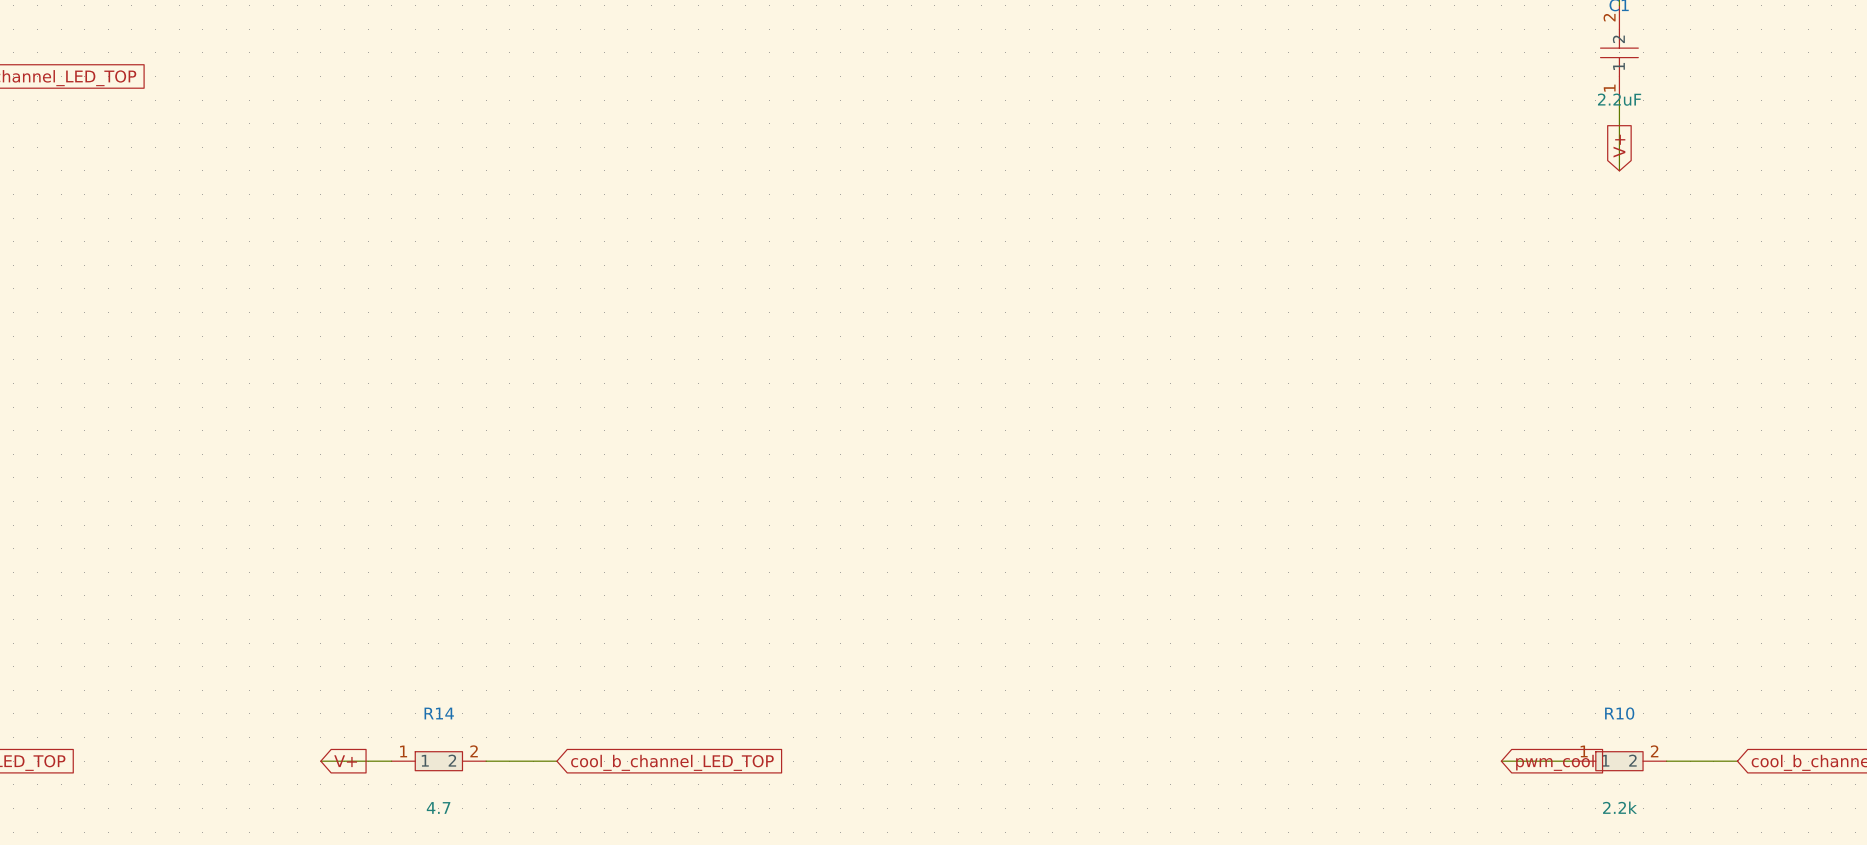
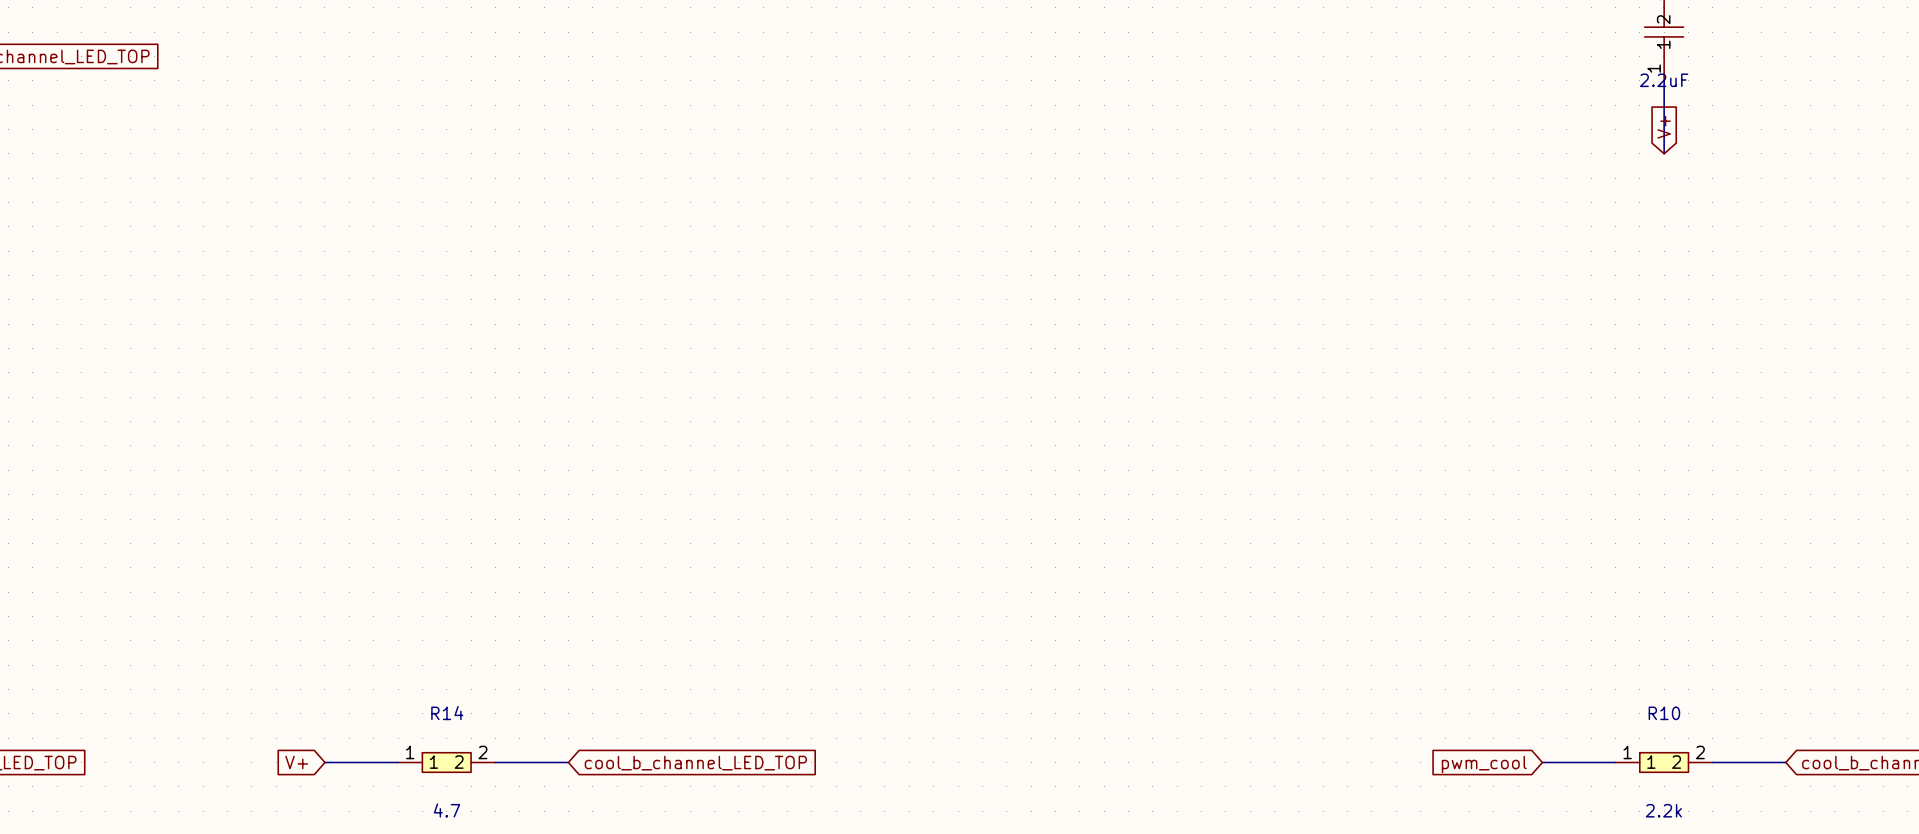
global label rotation: 0° (345, 761) -> 180° (296, 762)
global label rotation: 0° (1554, 762) -> 180° (1484, 764)

